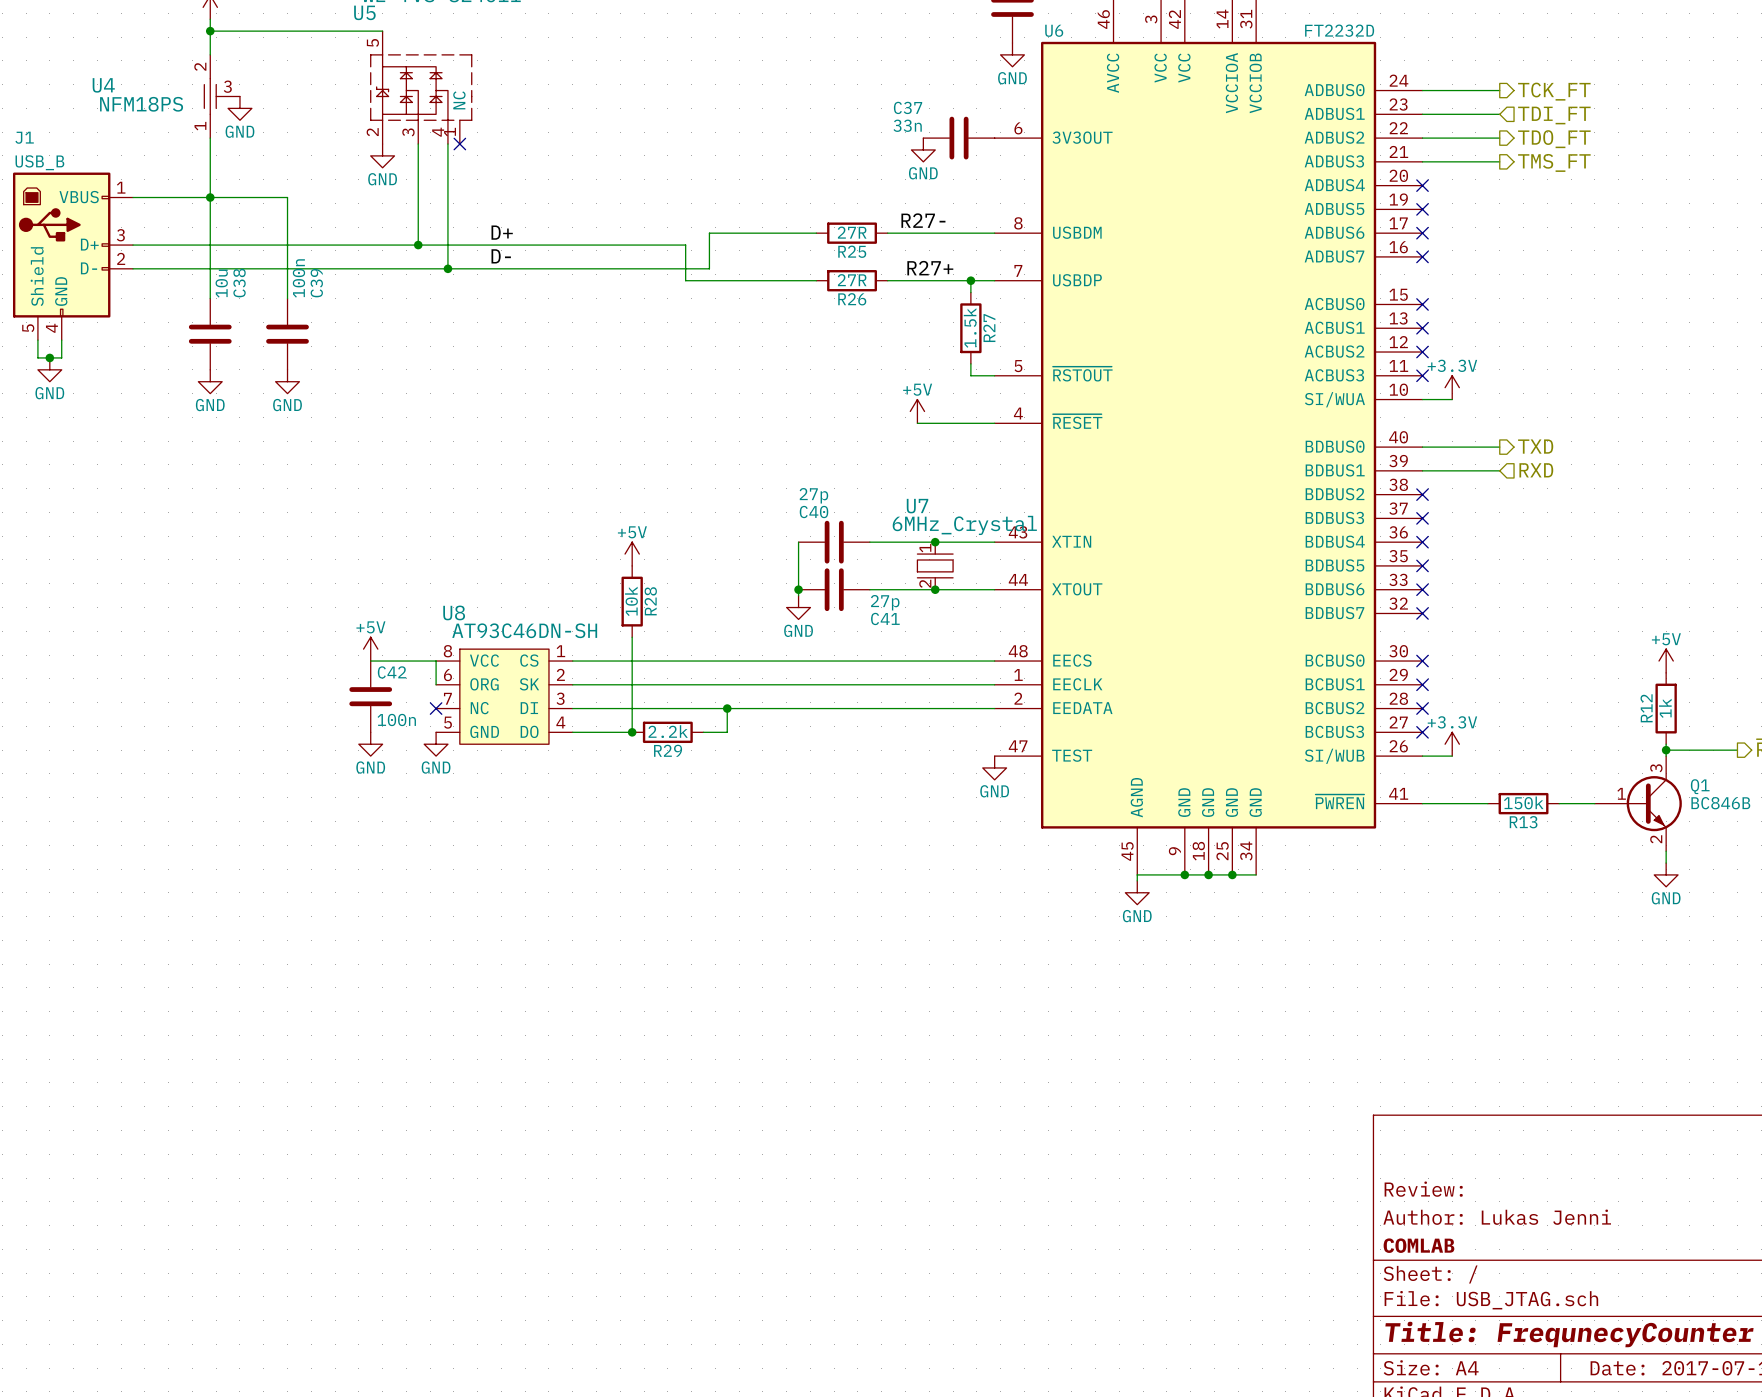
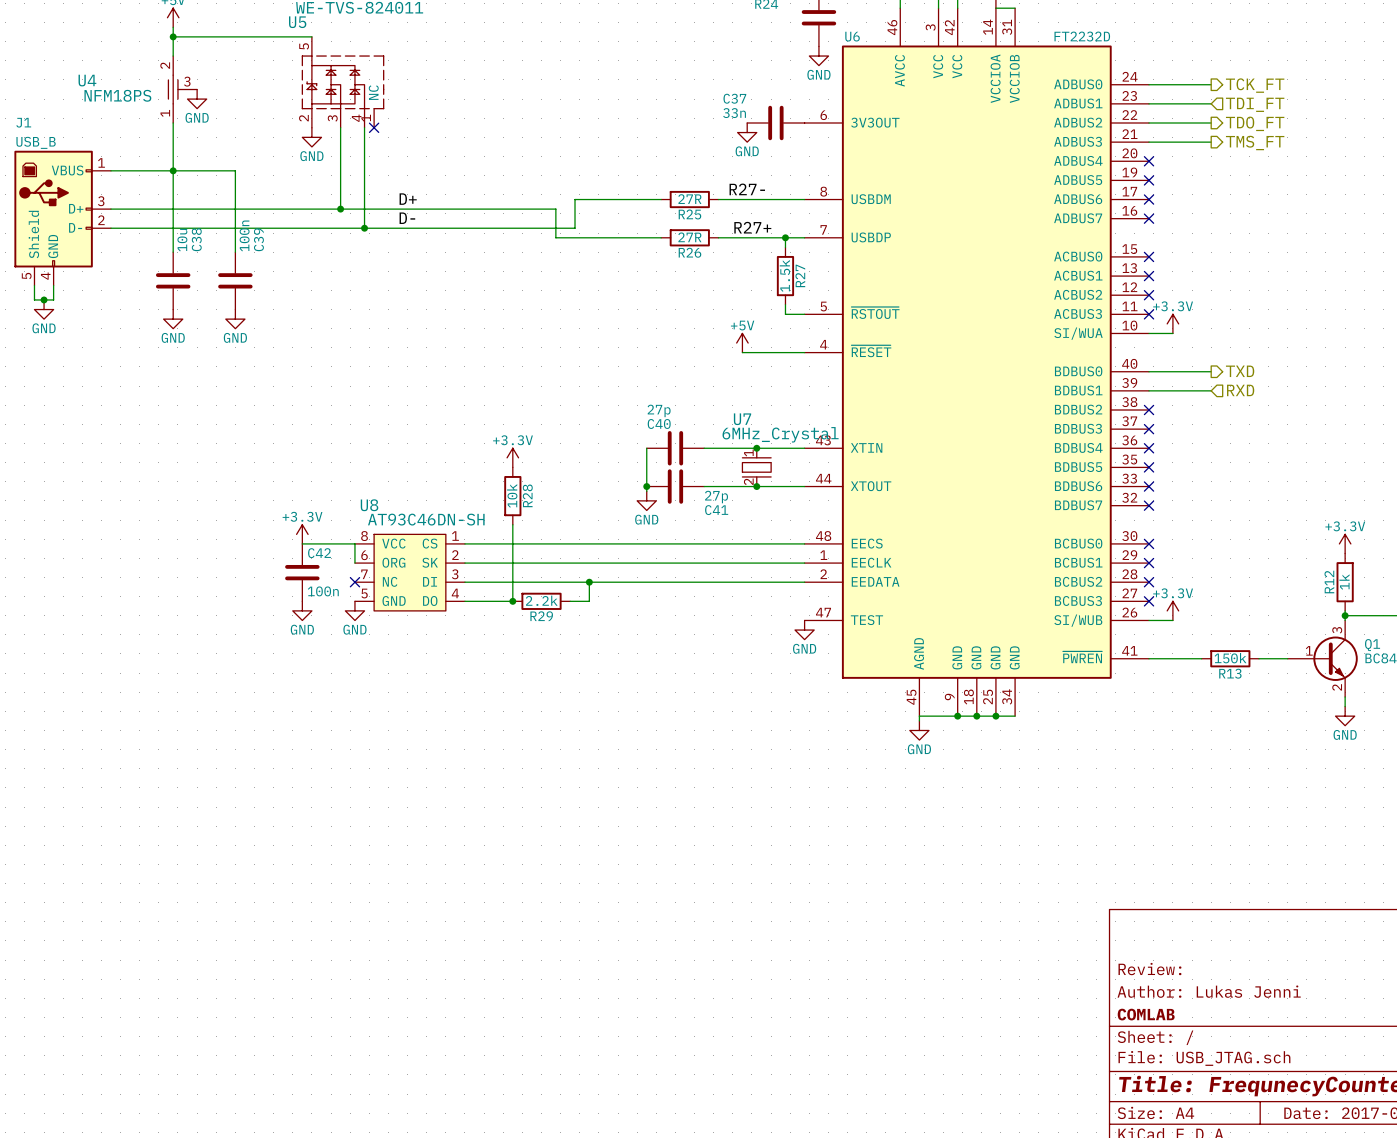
power symbol: +5V (632, 554) -> +3.3V (512, 457)
power symbol: +5V (370, 649) -> +3.3V (302, 534)
power symbol: +5V (1666, 661) -> +3.3V (1345, 543)

